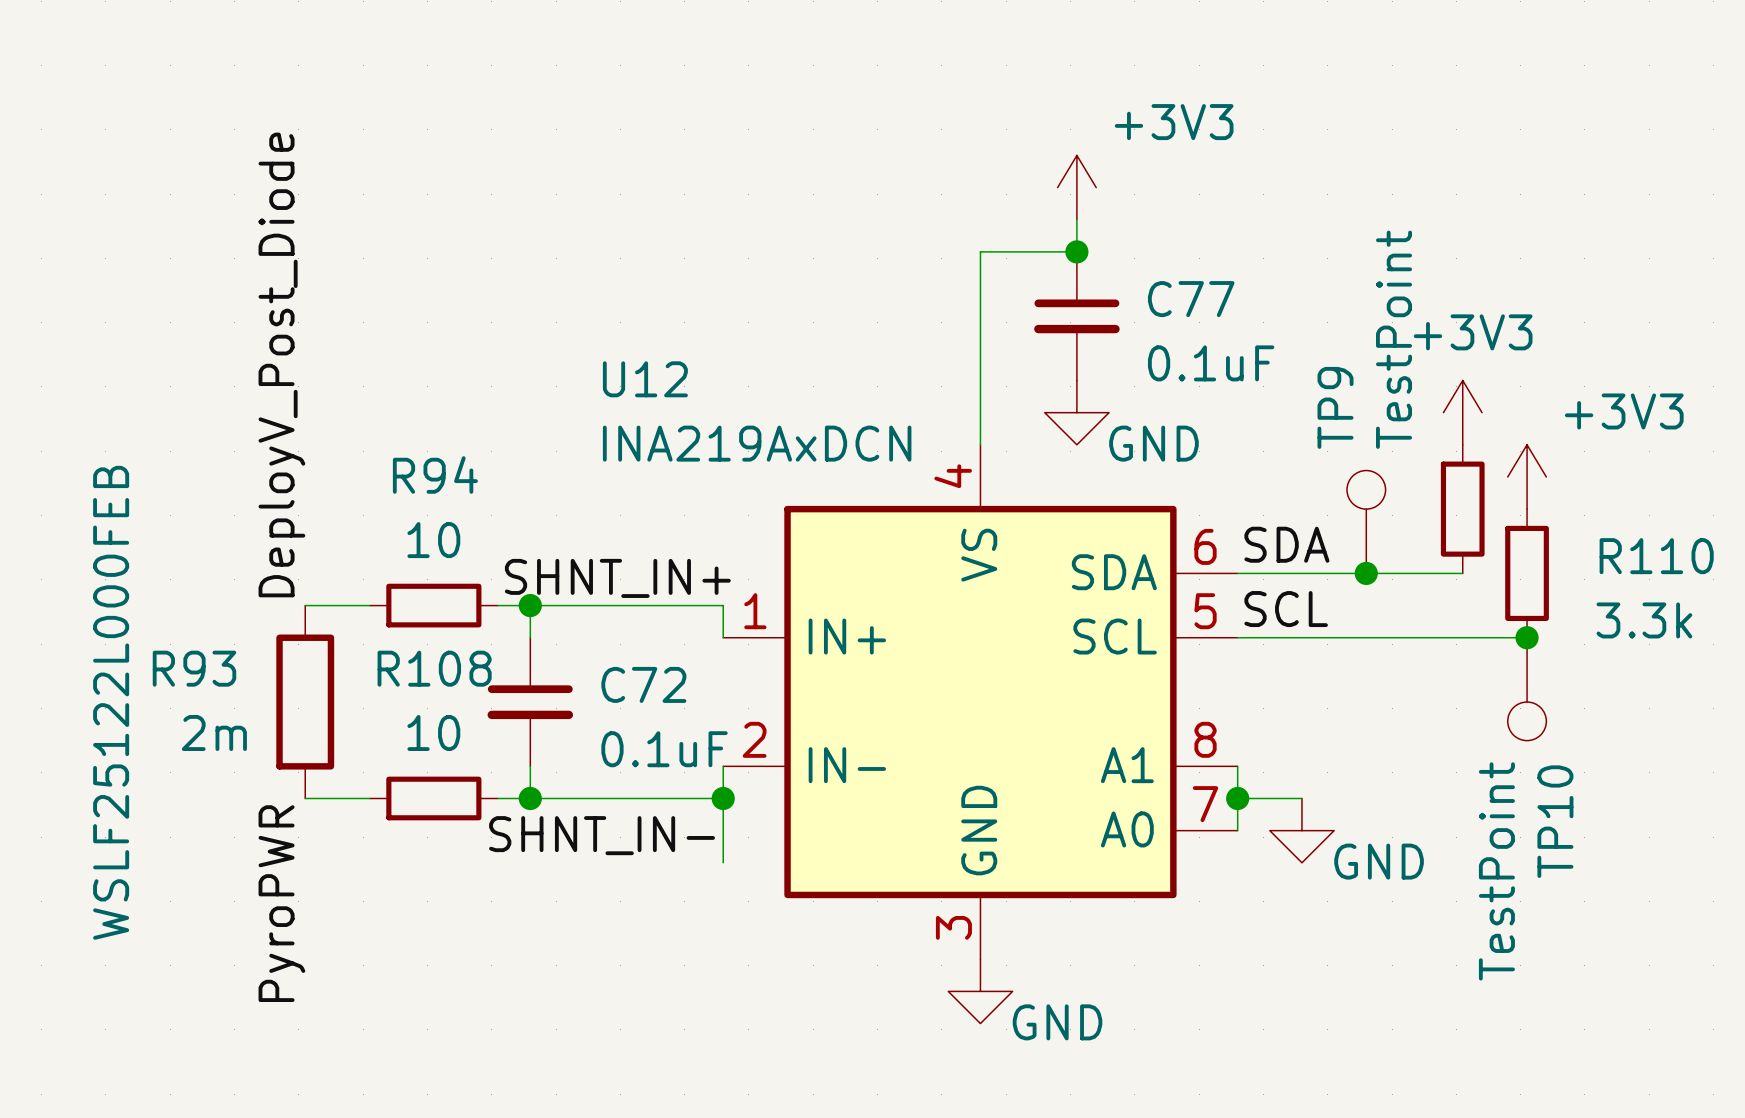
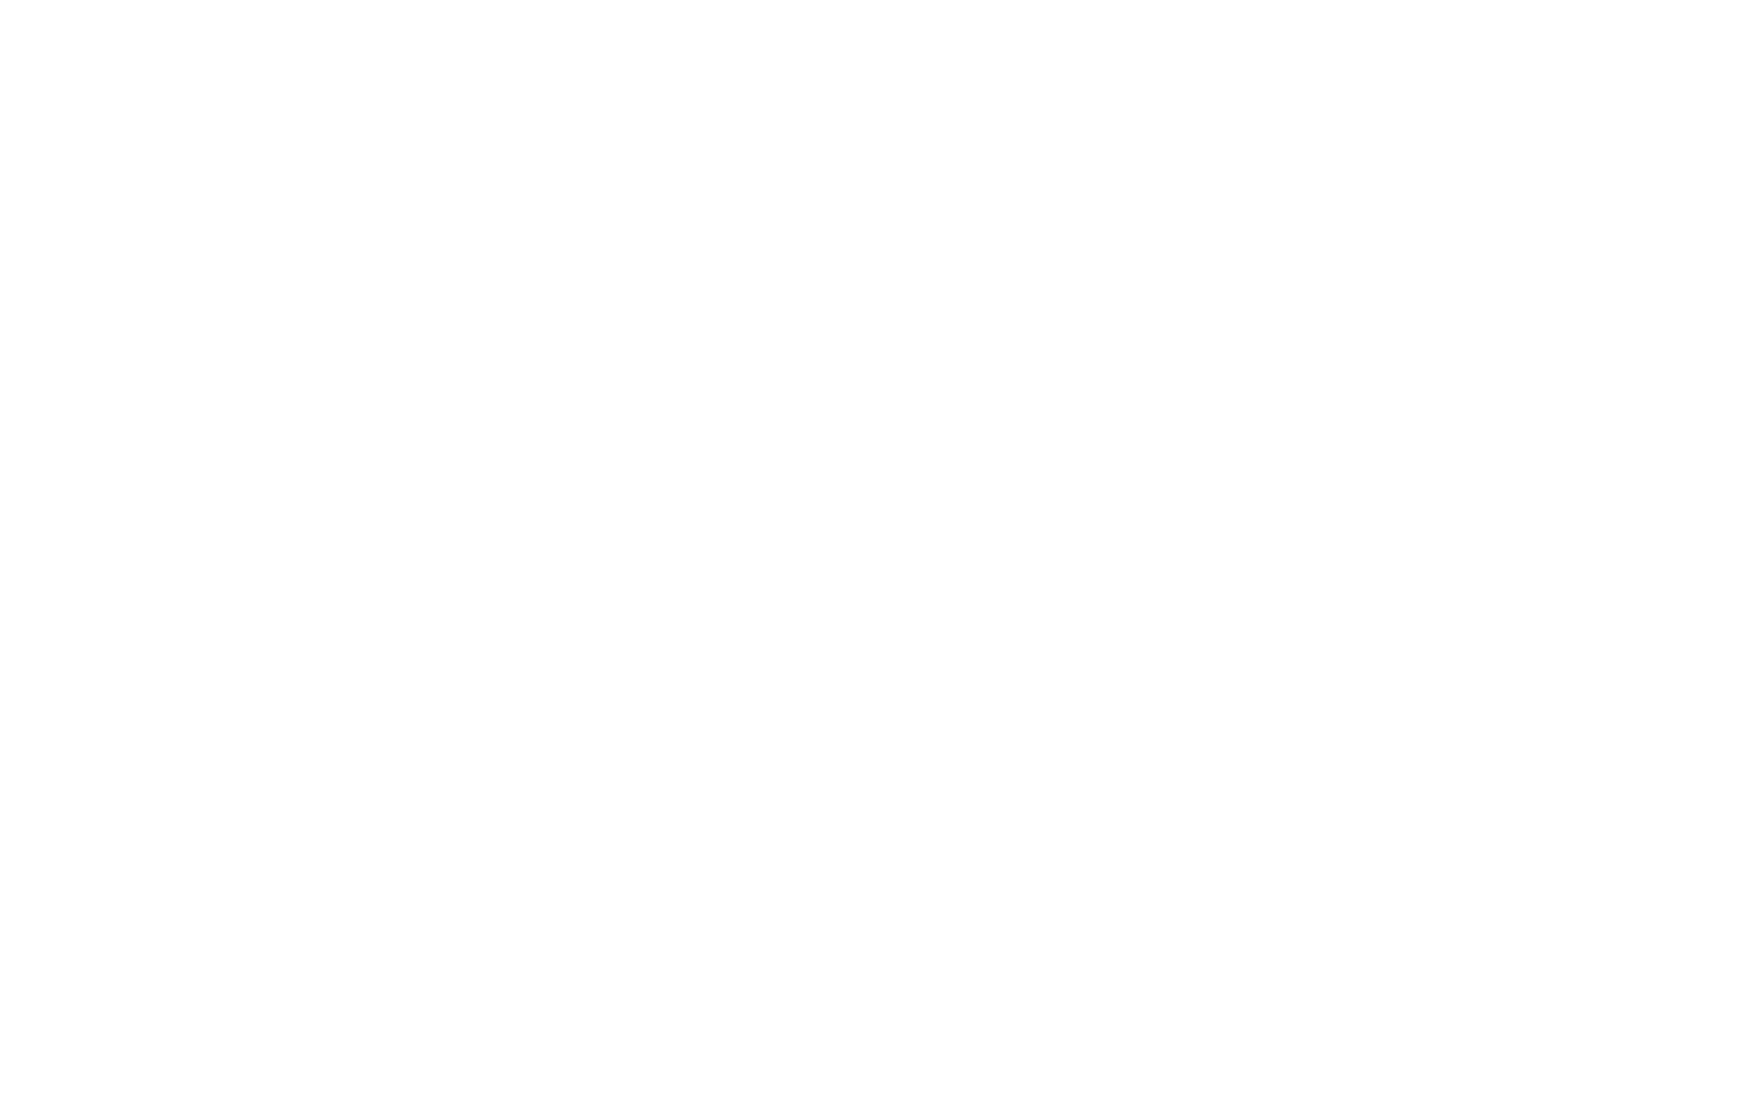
power symbol: +3V3 (1076, 187) -> none
wire: (1076, 219) (1076, 251) (980, 251) (980, 444) -> none
junction: (1076, 251) -> none
C77: 0.1uF (1076, 316) -> none
label: DeployV_Post_Diode (281, 364) -> none
power symbol: GND (1076, 412) -> none
power symbol: +3V3 (1462, 412) -> none
power symbol: +3V3 (1527, 476) -> none
part: (1462, 509) -> none
TP9: TestPoint (1366, 521) -> none
label: SDA (1286, 544) -> none
wire: (1237, 573) (1462, 573) -> none
junction: (1366, 573) -> none
R110: 3.3k (1527, 573) -> none
label: SHNT_IN+ (617, 578) -> none
wire: (305, 605) (369, 605) -> none
R94: 10 (433, 605) -> none
wire: (498, 605) (723, 605) (723, 637) -> none
wire: (530, 605) (530, 637) -> none
junction: (530, 605) -> none
label: SCL (1286, 609) -> none
wire: (1237, 637) (1527, 637) -> none
junction: (1527, 637) -> none
TP10: TestPoint (1527, 689) -> none
R93: 2m (305, 702) -> none
C72: 0.1uF (530, 702) -> none
U12: INA219AxDCN (980, 702) -> none
wire: (530, 766) (530, 798) -> none
wire: (723, 766) (723, 862) -> none
wire: (1237, 766) (1237, 830) -> none
wire: (305, 798) (369, 798) -> none
R108: 10 (433, 798) -> none
wire: (498, 798) (723, 798) -> none
junction: (530, 798) -> none
junction: (723, 798) -> none
wire: (1237, 798) (1301, 798) -> none
junction: (1237, 798) -> none
power symbol: GND (1301, 830) -> none
label: SHNT_IN- (602, 835) -> none
label: PyroPWR (281, 903) -> none
power symbol: GND (980, 991) -> none

